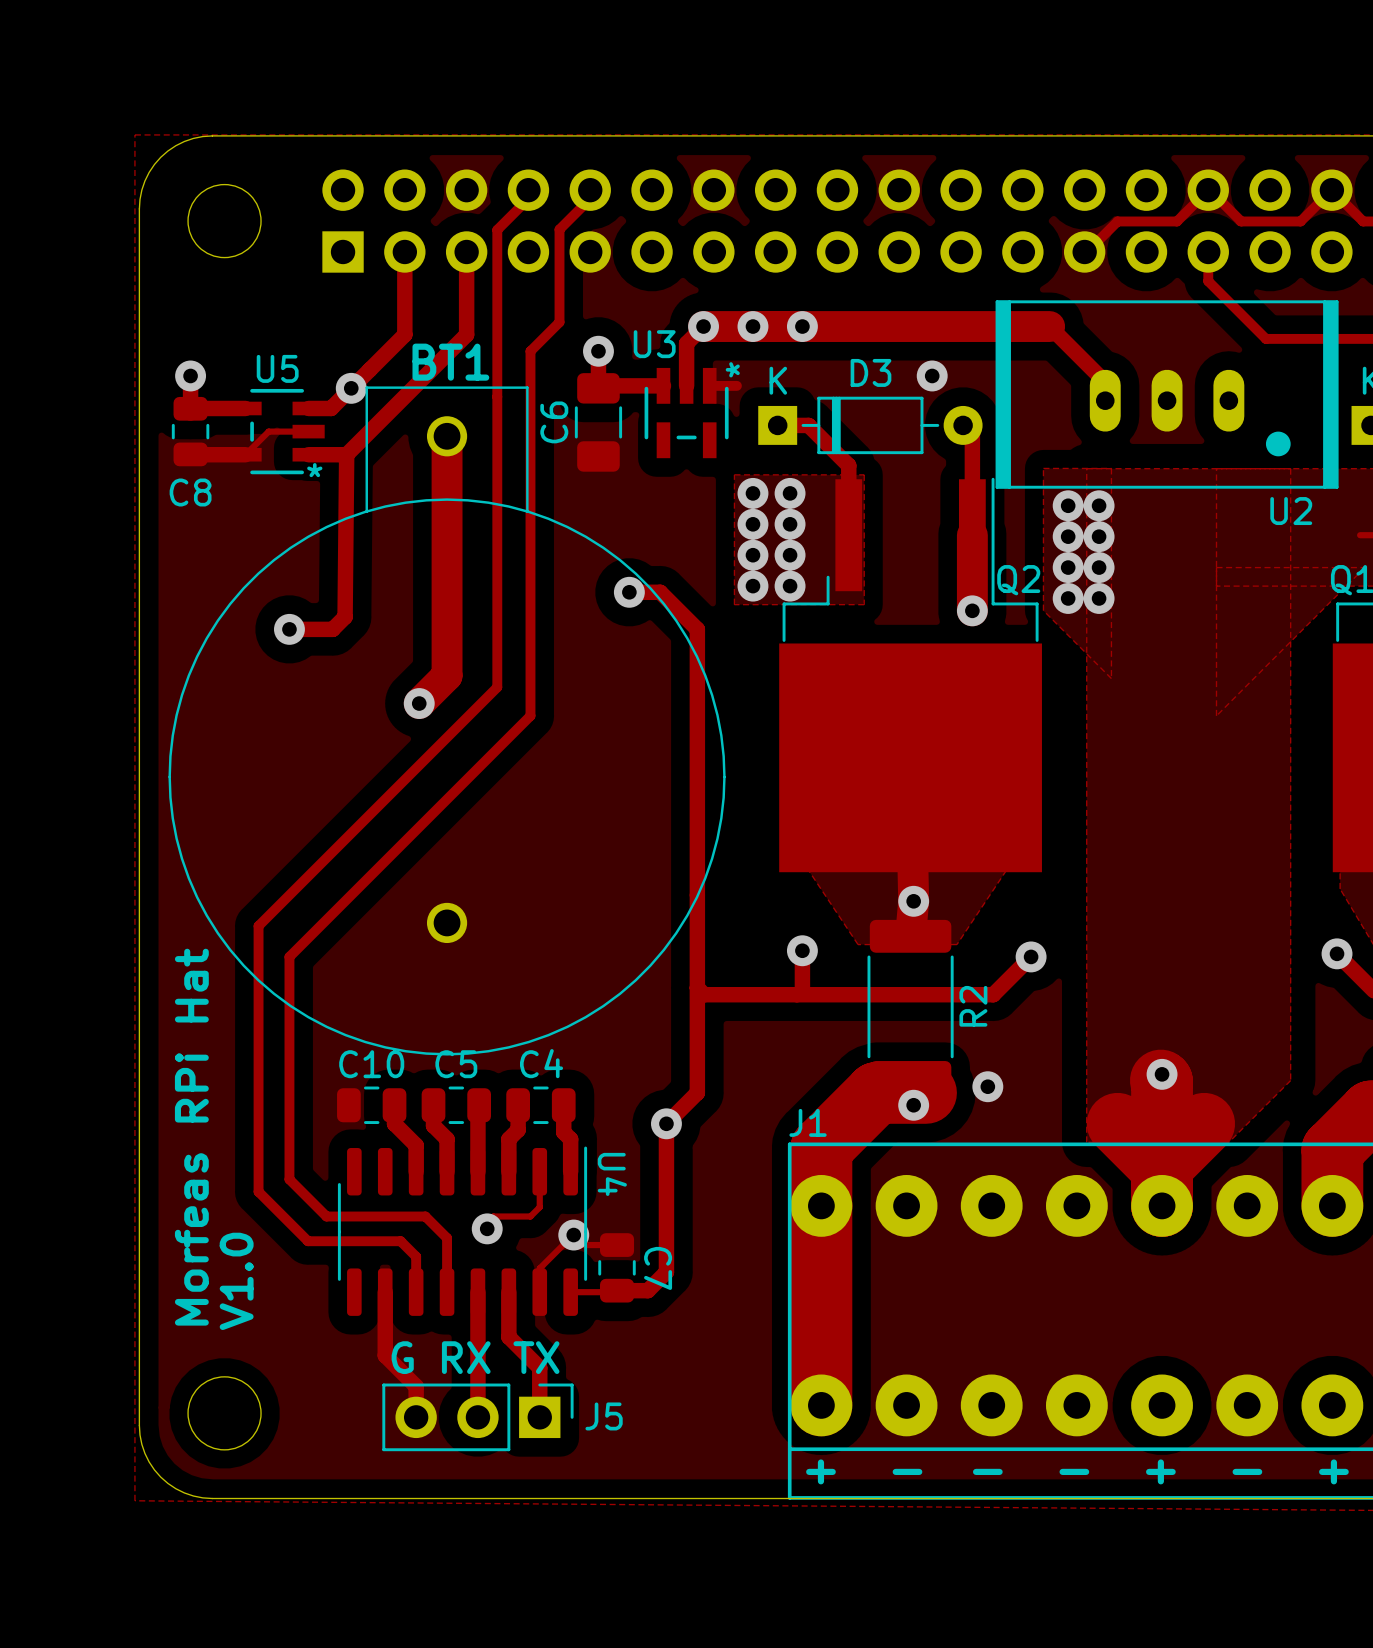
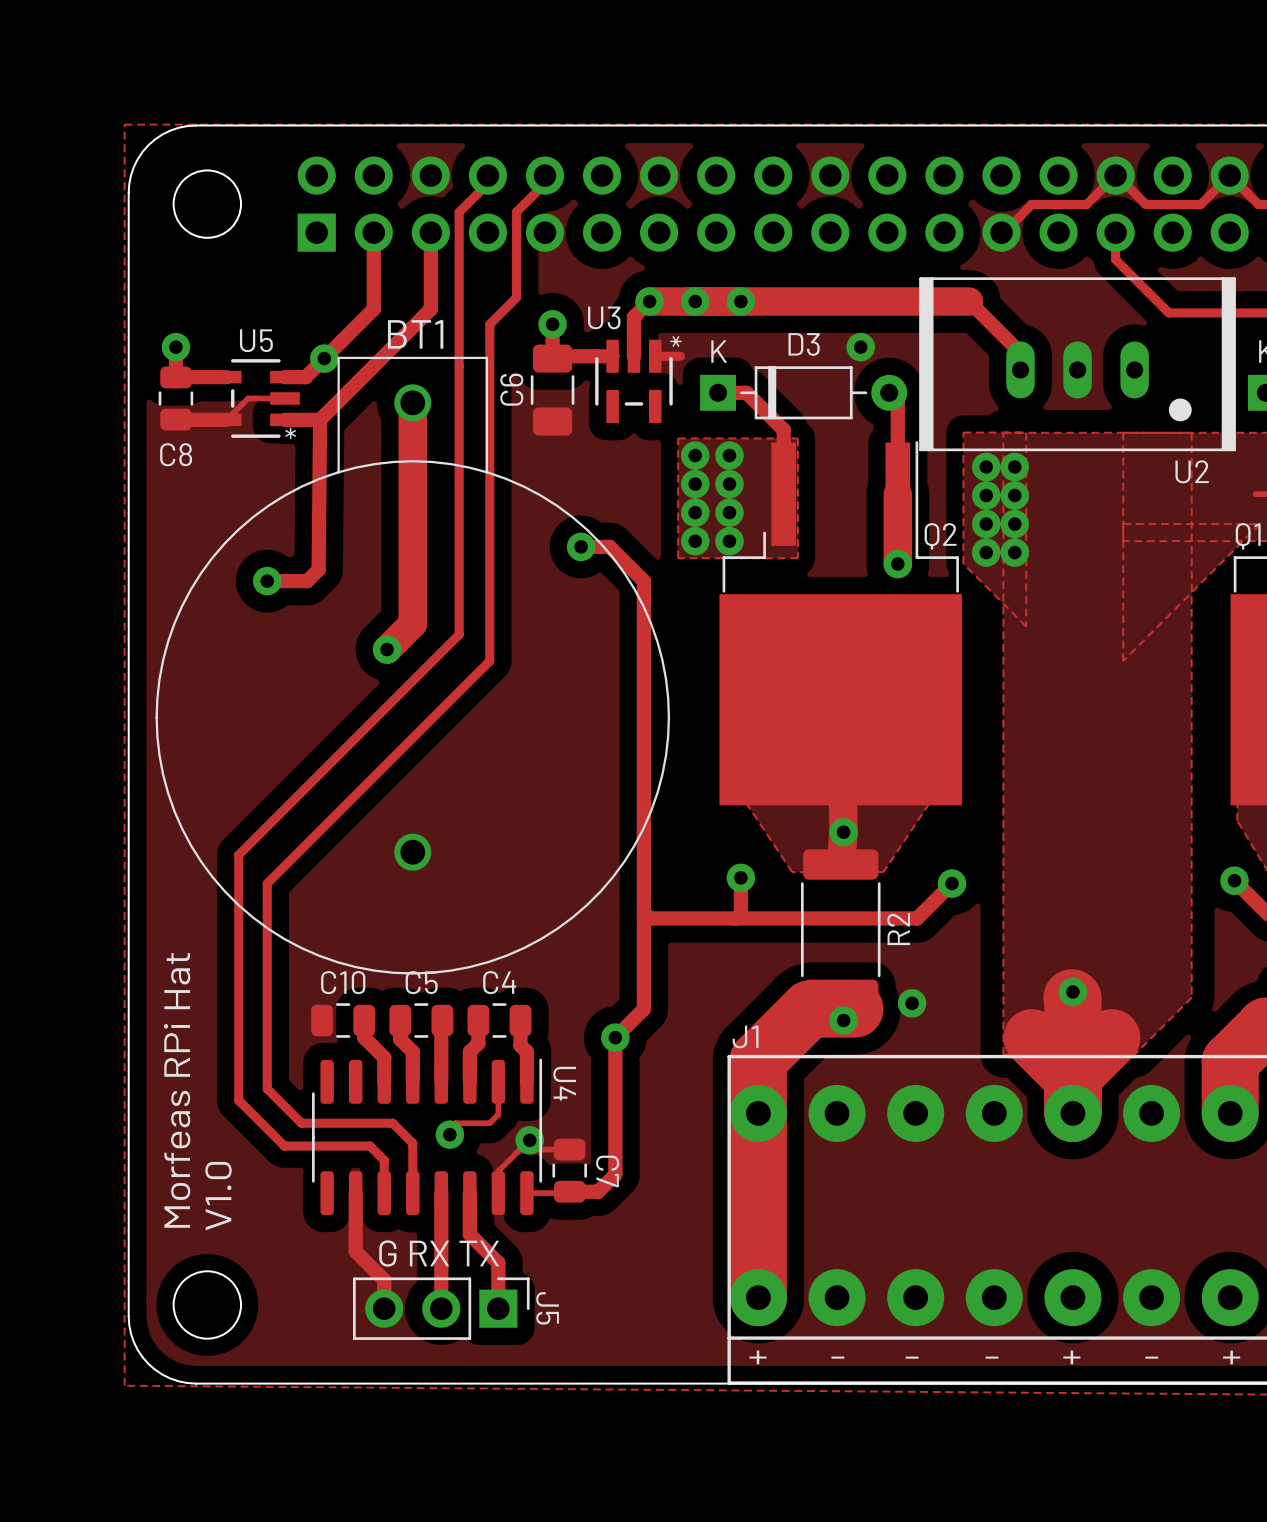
J5 name rotation: 0° (604, 1416) -> 90° clockwise (547, 1308)

